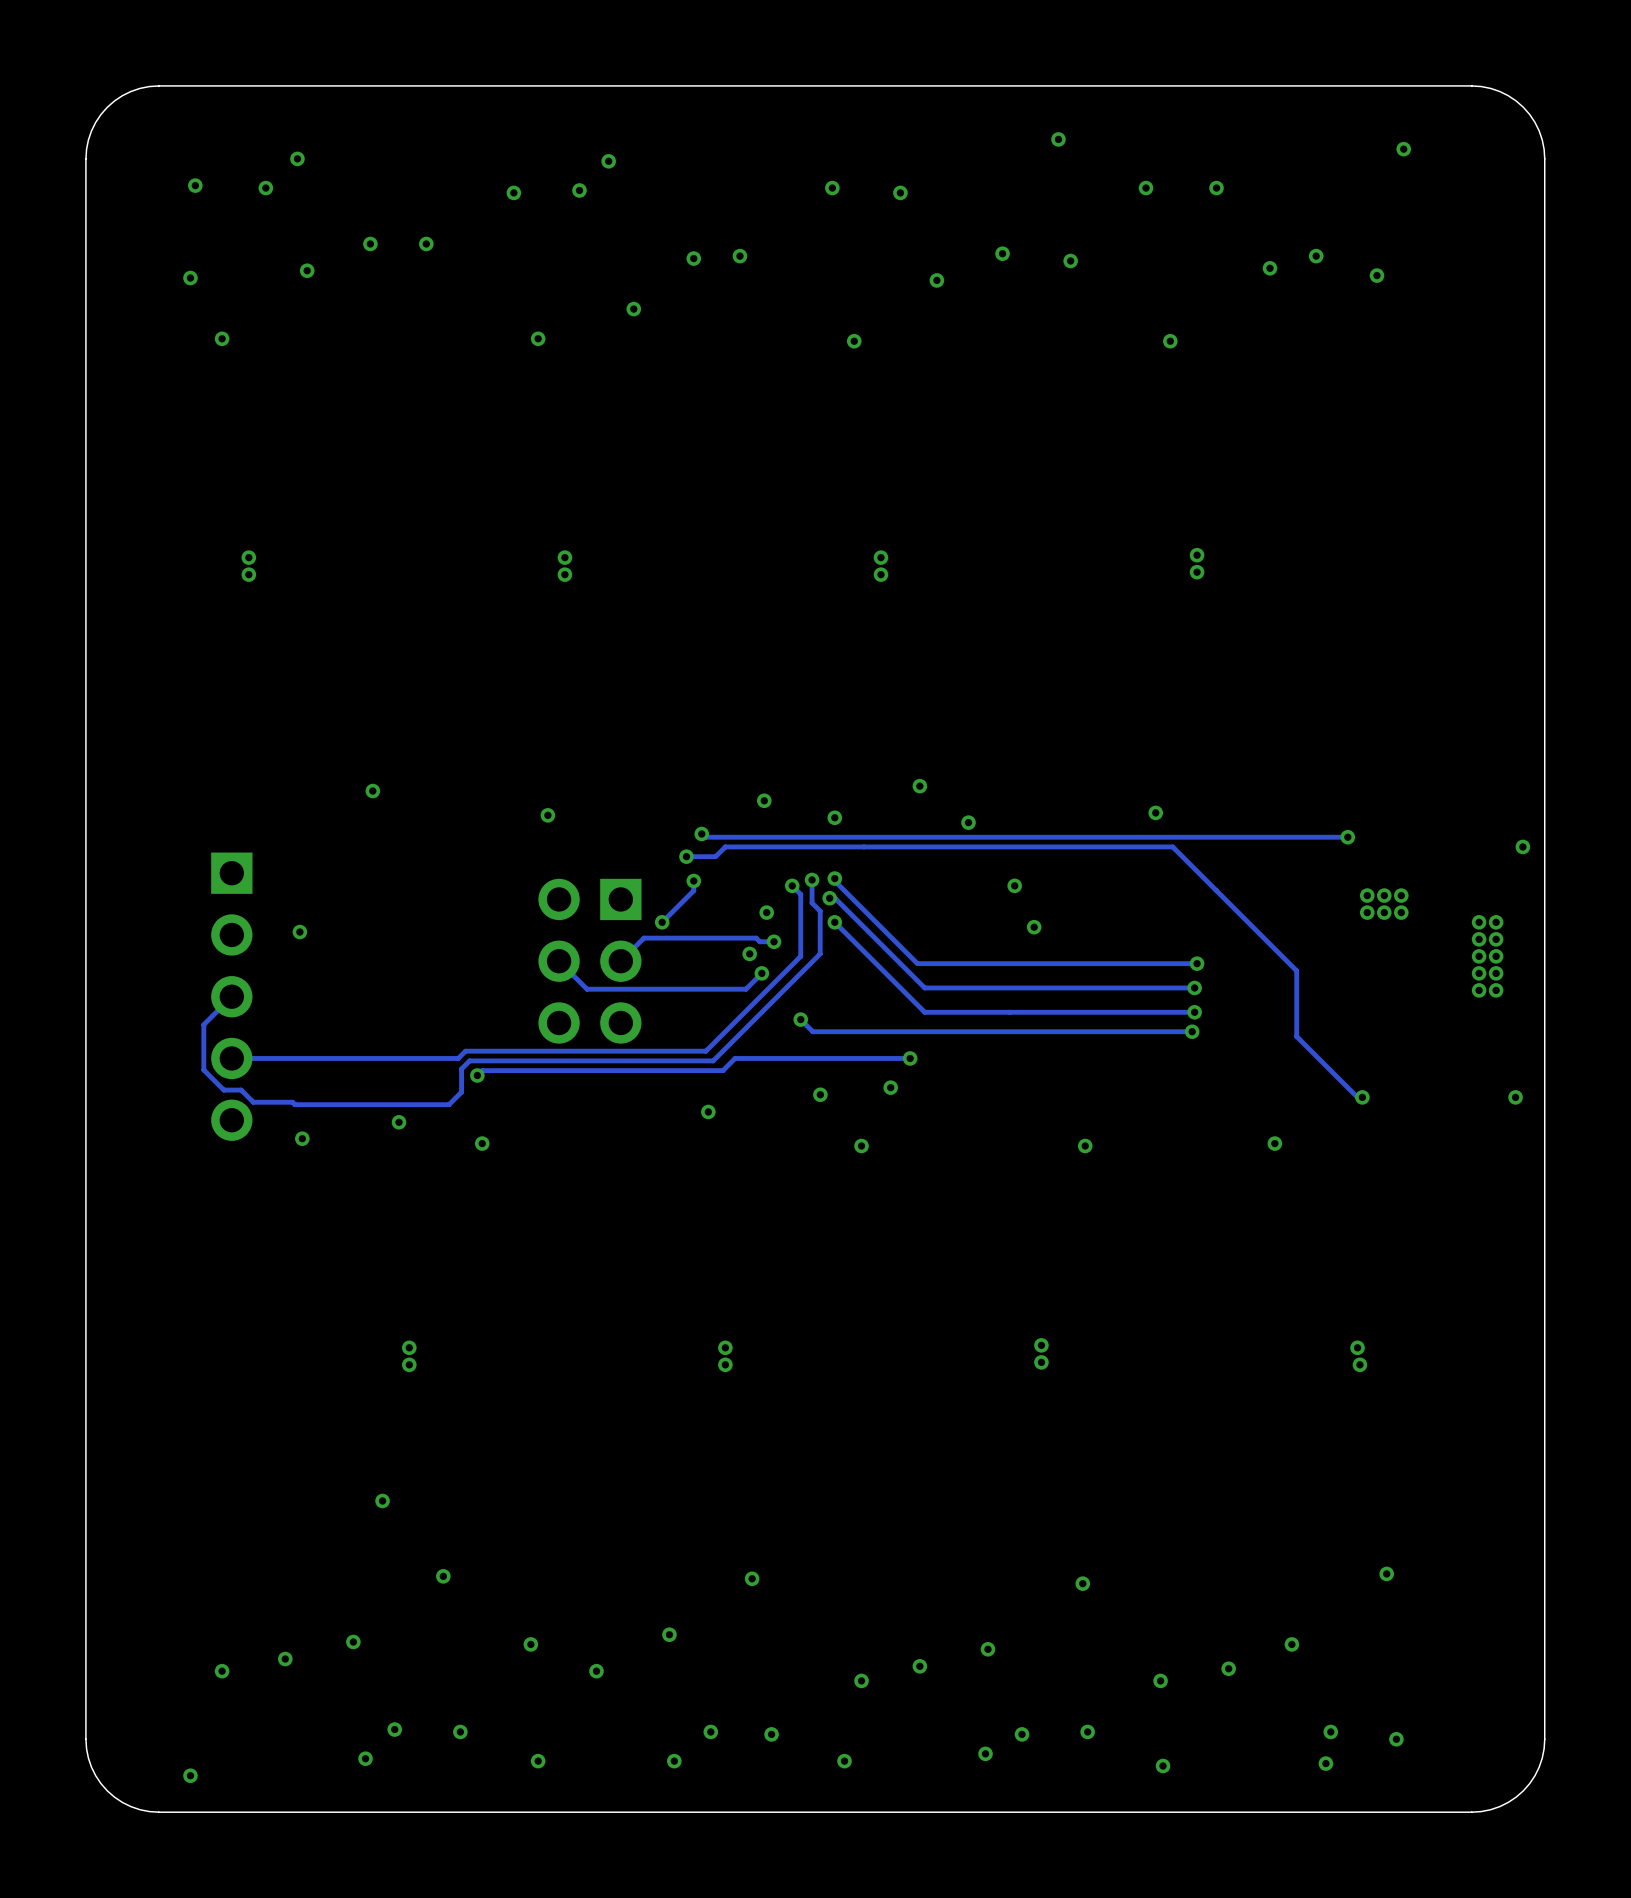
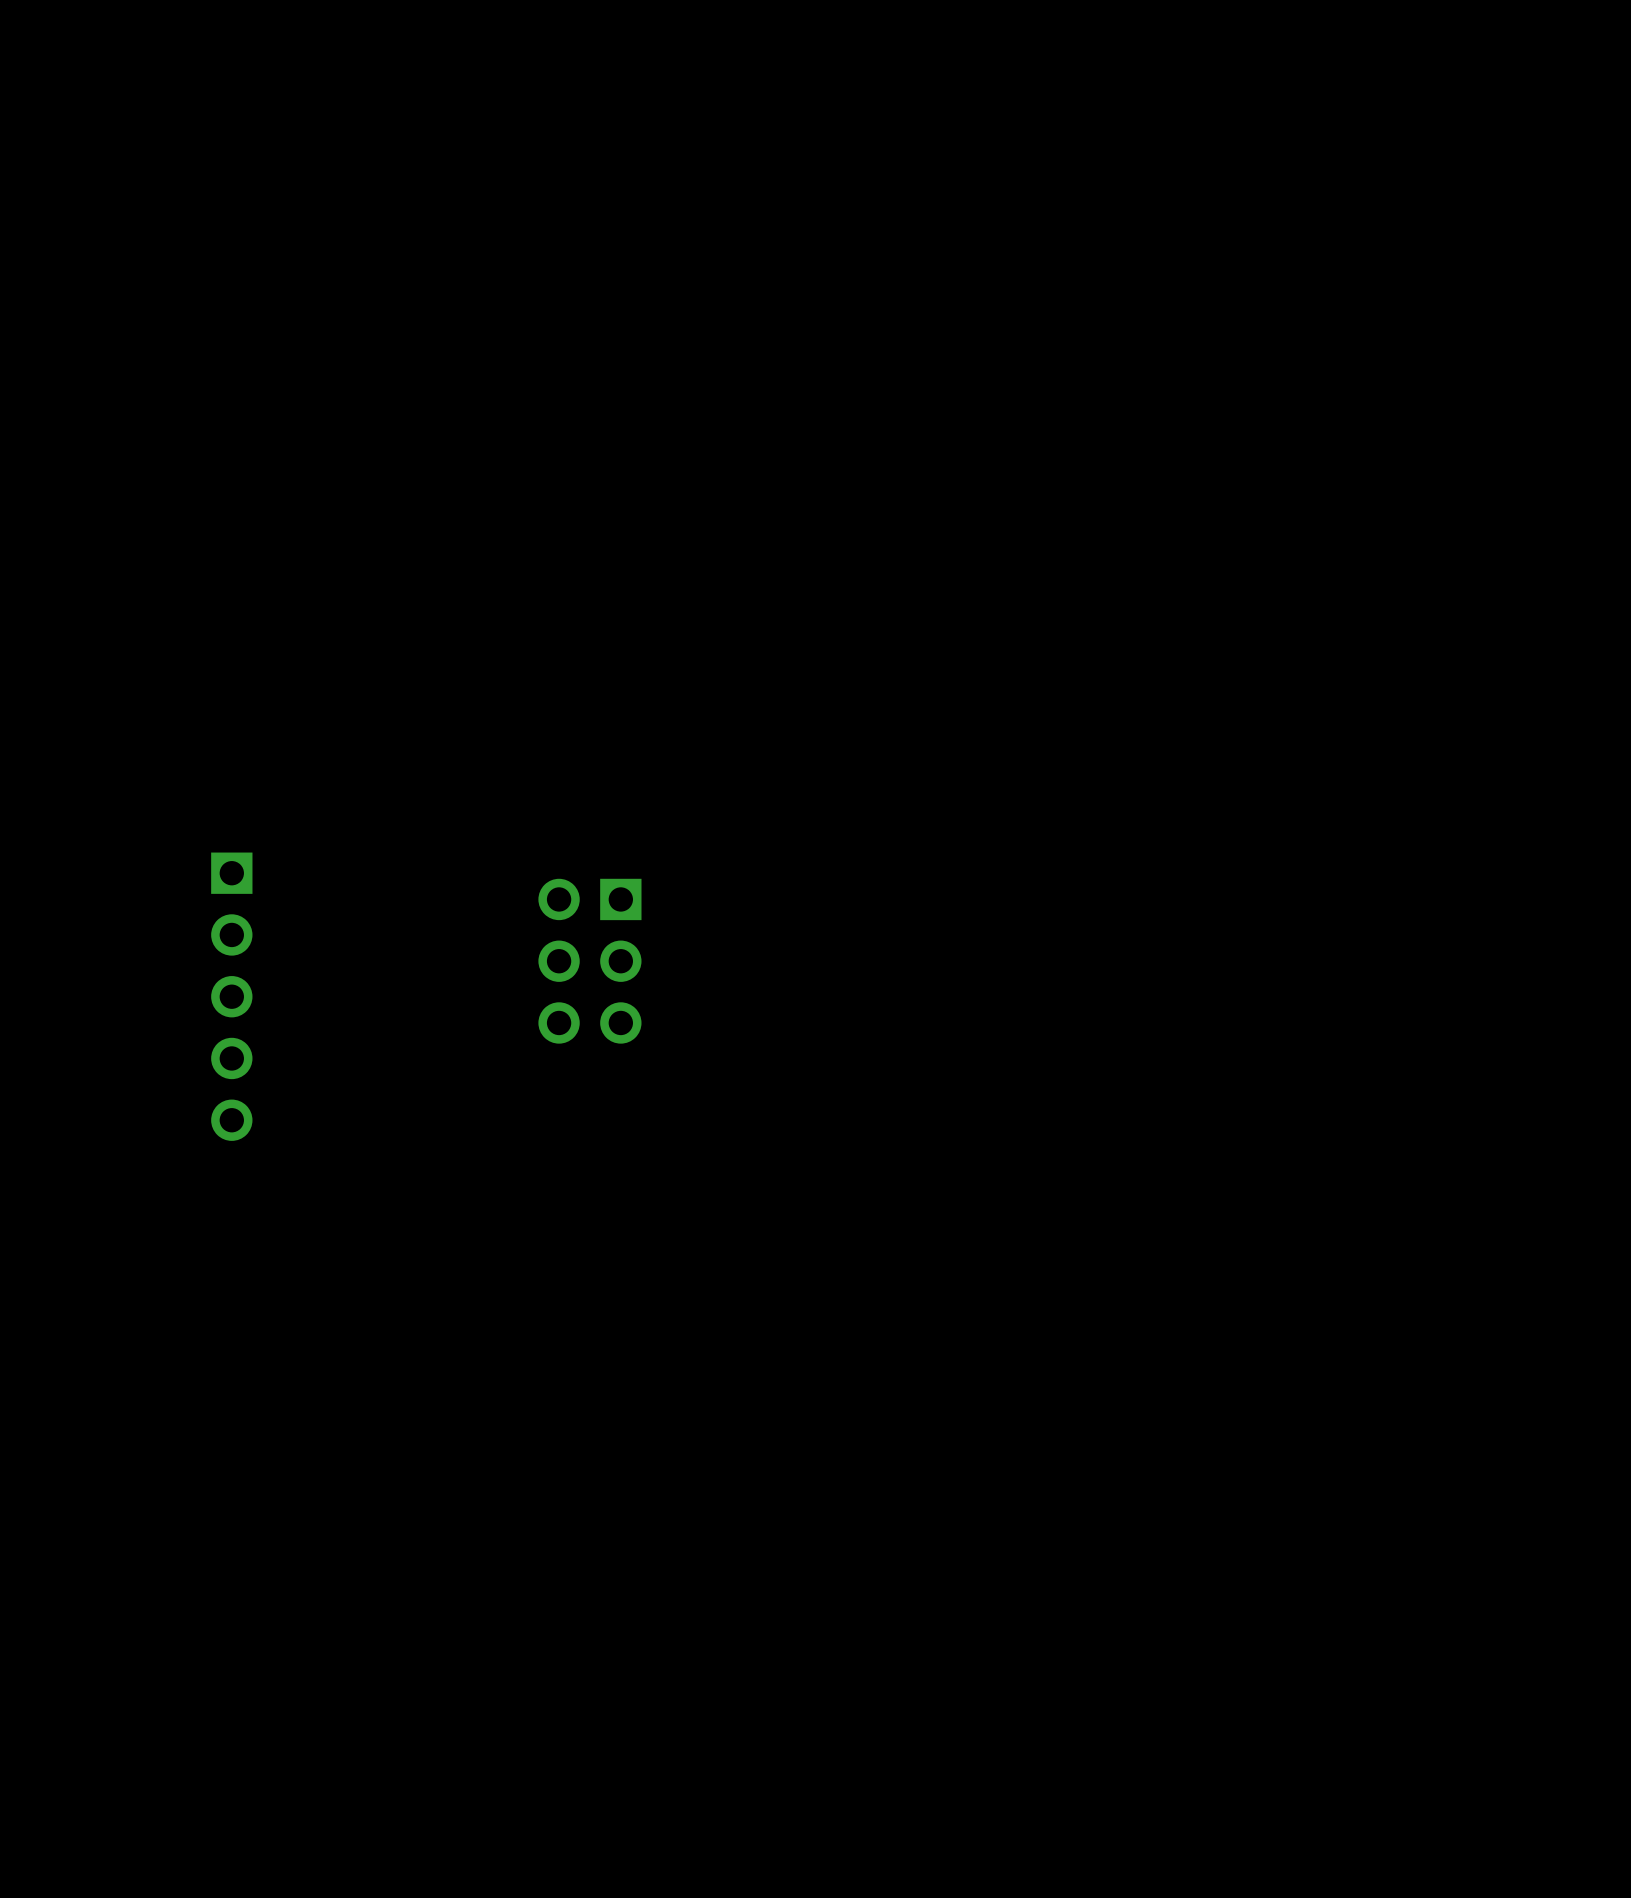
board edge: (1471, 85) (158, 85) (130, 91) (114, 101) (101, 114) (91, 130) (85, 158) (85, 1739) (91, 1767) (101, 1783) (114, 1797) (139, 1809) (158, 1812) (1471, 1812) (1490, 1809) (1508, 1802) (1529, 1783) (1539, 1767) (1544, 1739) (1544, 158) (1539, 130) (1523, 107) (1499, 91) (1471, 85) -> none
via: (1058, 139) -> none
via: (1403, 149) -> none
via: (297, 158) -> none
via: (608, 161) -> none
via: (195, 185) -> none
via: (265, 188) -> none
via: (832, 188) -> none
via: (1146, 188) -> none
via: (1216, 188) -> none
via: (579, 190) -> none
via: (513, 192) -> none
via: (900, 192) -> none
via: (370, 243) -> none
via: (426, 243) -> none
via: (1002, 253) -> none
via: (739, 256) -> none
via: (1316, 256) -> none
via: (693, 258) -> none
via: (1070, 260) -> none
via: (1270, 268) -> none
via: (307, 270) -> none
via: (1376, 275) -> none
via: (190, 278) -> none
via: (936, 280) -> none
via: (633, 309) -> none
via: (222, 338) -> none
via: (538, 338) -> none
via: (854, 341) -> none
via: (1170, 341) -> none
via: (1197, 555) -> none
via: (248, 557) -> none
via: (564, 557) -> none
via: (880, 557) -> none
via: (1197, 572) -> none
via: (248, 574) -> none
via: (564, 574) -> none
via: (880, 574) -> none
via: (919, 786) -> none
via: (372, 791) -> none
via: (764, 800) -> none
via: (1155, 812) -> none
via: (547, 815) -> none
via: (834, 817) -> none
via: (968, 822) -> none
track: (701, 833) (704, 837) (1347, 837) -> none
via: (701, 833) -> none
via: (1347, 837) -> none
via: (1522, 846) -> none
track: (686, 856) (715, 856) (725, 846) (1172, 846) (1296, 970) (1296, 1036) (1357, 1097) (1362, 1097) -> none
via: (686, 856) -> none
track: (834, 878) (834, 880) (917, 963) (1197, 963) -> none
via: (834, 878) -> none
track: (812, 879) (812, 902) (820, 911) (820, 953) (713, 1060) (469, 1060) (461, 1068) (461, 1092) (449, 1104) (295, 1104) (292, 1102) (253, 1102) (241, 1090) (223, 1090) (203, 1070) (203, 1024) (231, 996) -> none
via: (812, 879) -> none
track: (693, 880) (693, 890) (662, 922) -> none
via: (693, 880) -> none
track: (792, 885) (800, 894) (800, 956) (705, 1051) (465, 1051) (458, 1058) (231, 1058) -> none
via: (792, 885) -> none
via: (1014, 885) -> none
via: (1367, 895) -> none
via: (1384, 895) -> none
via: (1401, 895) -> none
track: (829, 898) (835, 898) (924, 987) (1194, 987) -> none
via: (829, 898) -> none
via: (766, 912) -> none
via: (1367, 912) -> none
via: (1384, 912) -> none
via: (1401, 912) -> none
via: (662, 922) -> none
track: (834, 922) (924, 1012) (1194, 1012) -> none
via: (834, 922) -> none
via: (1479, 922) -> none
via: (1496, 922) -> none
via: (1034, 927) -> none
via: (299, 932) -> none
via: (1479, 939) -> none
via: (1496, 939) -> none
track: (774, 941) (759, 941) (756, 938) (643, 938) (620, 961) -> none
via: (774, 941) -> none
via: (749, 953) -> none
via: (1479, 956) -> none
via: (1496, 956) -> none
track: (559, 961) (587, 989) (746, 989) (761, 973) -> none
via: (1197, 963) -> none
via: (761, 973) -> none
via: (1479, 973) -> none
via: (1496, 973) -> none
via: (1194, 987) -> none
via: (1479, 990) -> none
via: (1496, 990) -> none
via: (1194, 1012) -> none
track: (800, 1019) (812, 1031) (1192, 1031) -> none
via: (800, 1019) -> none
via: (1192, 1031) -> none
track: (910, 1058) (735, 1058) (722, 1070) (482, 1070) (477, 1075) -> none
via: (910, 1058) -> none
via: (477, 1075) -> none
via: (890, 1087) -> none
via: (820, 1094) -> none
via: (1362, 1097) -> none
via: (1515, 1097) -> none
via: (708, 1111) -> none
via: (399, 1122) -> none
via: (302, 1138) -> none
via: (482, 1143) -> none
via: (1274, 1143) -> none
via: (861, 1146) -> none
via: (1085, 1146) -> none
via: (1041, 1345) -> none
via: (409, 1347) -> none
via: (725, 1347) -> none
via: (1357, 1347) -> none
via: (1041, 1362) -> none
via: (409, 1364) -> none
via: (725, 1364) -> none
via: (1359, 1364) -> none
via: (382, 1500) -> none
via: (1386, 1573) -> none
via: (443, 1576) -> none
via: (752, 1578) -> none
via: (1082, 1583) -> none
via: (669, 1634) -> none
via: (353, 1642) -> none
via: (530, 1644) -> none
via: (1291, 1644) -> none
via: (987, 1649) -> none
via: (285, 1659) -> none
via: (919, 1666) -> none
via: (1228, 1668) -> none
via: (222, 1671) -> none
via: (596, 1671) -> none
via: (861, 1680) -> none
via: (1160, 1680) -> none
via: (394, 1729) -> none
via: (460, 1731) -> none
via: (710, 1731) -> none
via: (1087, 1731) -> none
via: (1330, 1731) -> none
via: (771, 1734) -> none
via: (1022, 1734) -> none
via: (1396, 1739) -> none
via: (985, 1753) -> none
via: (365, 1758) -> none
via: (538, 1761) -> none
via: (674, 1761) -> none
via: (844, 1761) -> none
via: (1325, 1763) -> none
via: (1163, 1766) -> none
via: (190, 1775) -> none

